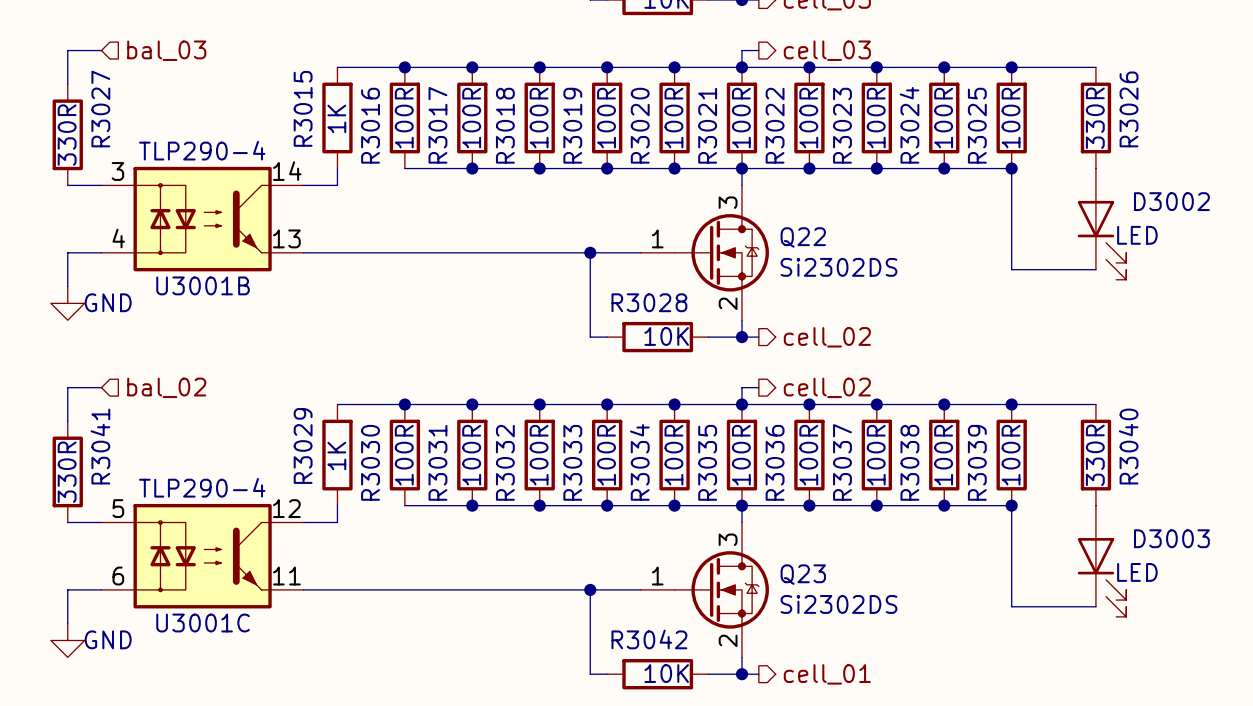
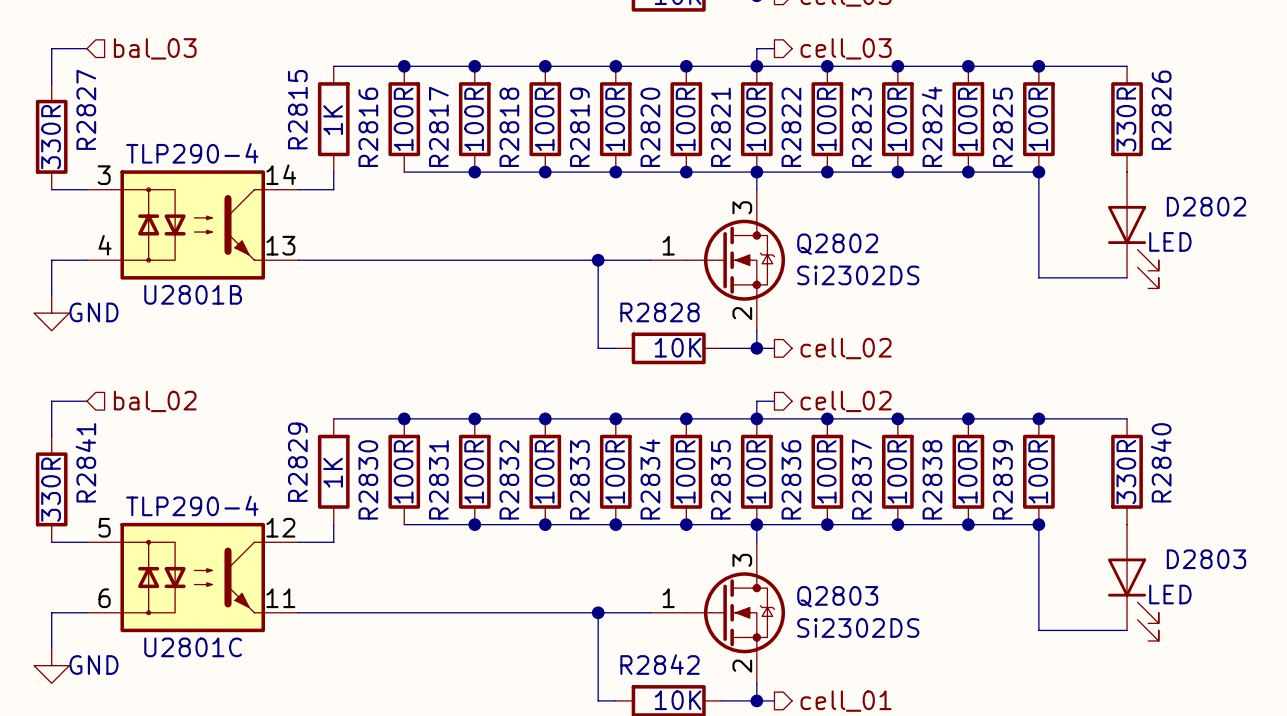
R3015 name: R3015 (303, 108) -> R2815 (297, 109)
R3027 name: R3027 (100, 109) -> R2827 (86, 109)
R3026 name: R3026 (1129, 109) -> R2826 (1161, 110)
R3016 name: R3016 (370, 125) -> R2816 (368, 127)
R3017 name: R3017 (437, 125) -> R2817 (438, 126)
R3018 name: R3018 (505, 125) -> R2818 (509, 127)
R3019 name: R3019 (572, 125) -> R2819 (579, 127)
R3020 name: R3020 (640, 125) -> R2820 (650, 127)
R3021 name: R3021 (707, 125) -> R2821 (720, 127)
R3022 name: R3022 (775, 125) -> R2822 (791, 127)
R3023 name: R3023 (842, 125) -> R2823 (861, 127)
R3024 name: R3024 (909, 125) -> R2824 (932, 126)
R3025 name: R3025 (977, 125) -> R2825 (1002, 127)
D3002 name: D3002 (1171, 201) -> D2802 (1206, 206)
Q22 name: Q22 (803, 237) -> Q2802 (837, 244)
U3001B name: U3001B (203, 285) -> U2801B (193, 294)
R3028 name: R3028 (649, 302) -> R2828 (660, 312)
R3029 name: R3029 (303, 445) -> R2829 (297, 462)
R3041 name: R3041 (100, 446) -> R2841 (85, 462)
R3040 name: R3040 (1128, 446) -> R2840 (1161, 462)
R3030 name: R3030 (370, 462) -> R2830 (368, 479)
R3031 name: R3031 (437, 462) -> R2831 (438, 479)
R3032 name: R3032 (505, 462) -> R2832 (509, 479)
R3033 name: R3033 (572, 462) -> R2833 (579, 479)
R3034 name: R3034 (639, 462) -> R2834 (649, 479)
R3035 name: R3035 (707, 462) -> R2835 (720, 479)
R3036 name: R3036 (775, 462) -> R2836 (791, 479)
R3037 name: R3037 (842, 462) -> R2837 (861, 479)
R3038 name: R3038 (909, 462) -> R2838 (932, 479)
R3039 name: R3039 (977, 462) -> R2839 (1002, 479)
D3003 name: D3003 (1171, 538) -> D2803 (1206, 559)
Q23 name: Q23 (803, 574) -> Q2803 (837, 596)
U3001C name: U3001C (203, 623) -> U2801C (193, 647)
R3042 name: R3042 (649, 639) -> R2842 (660, 664)

